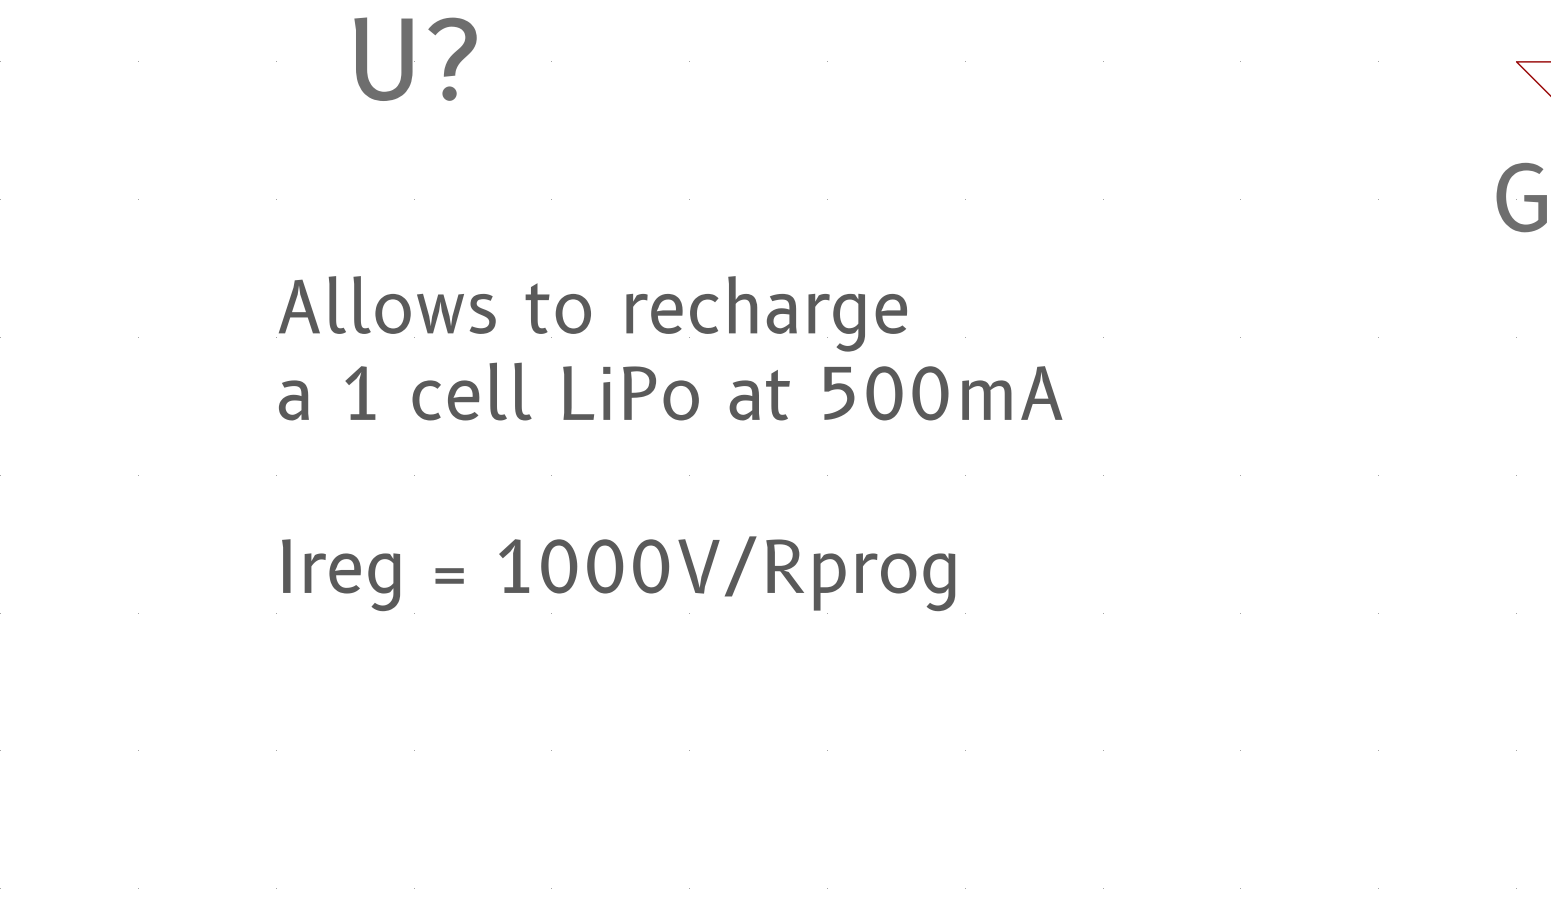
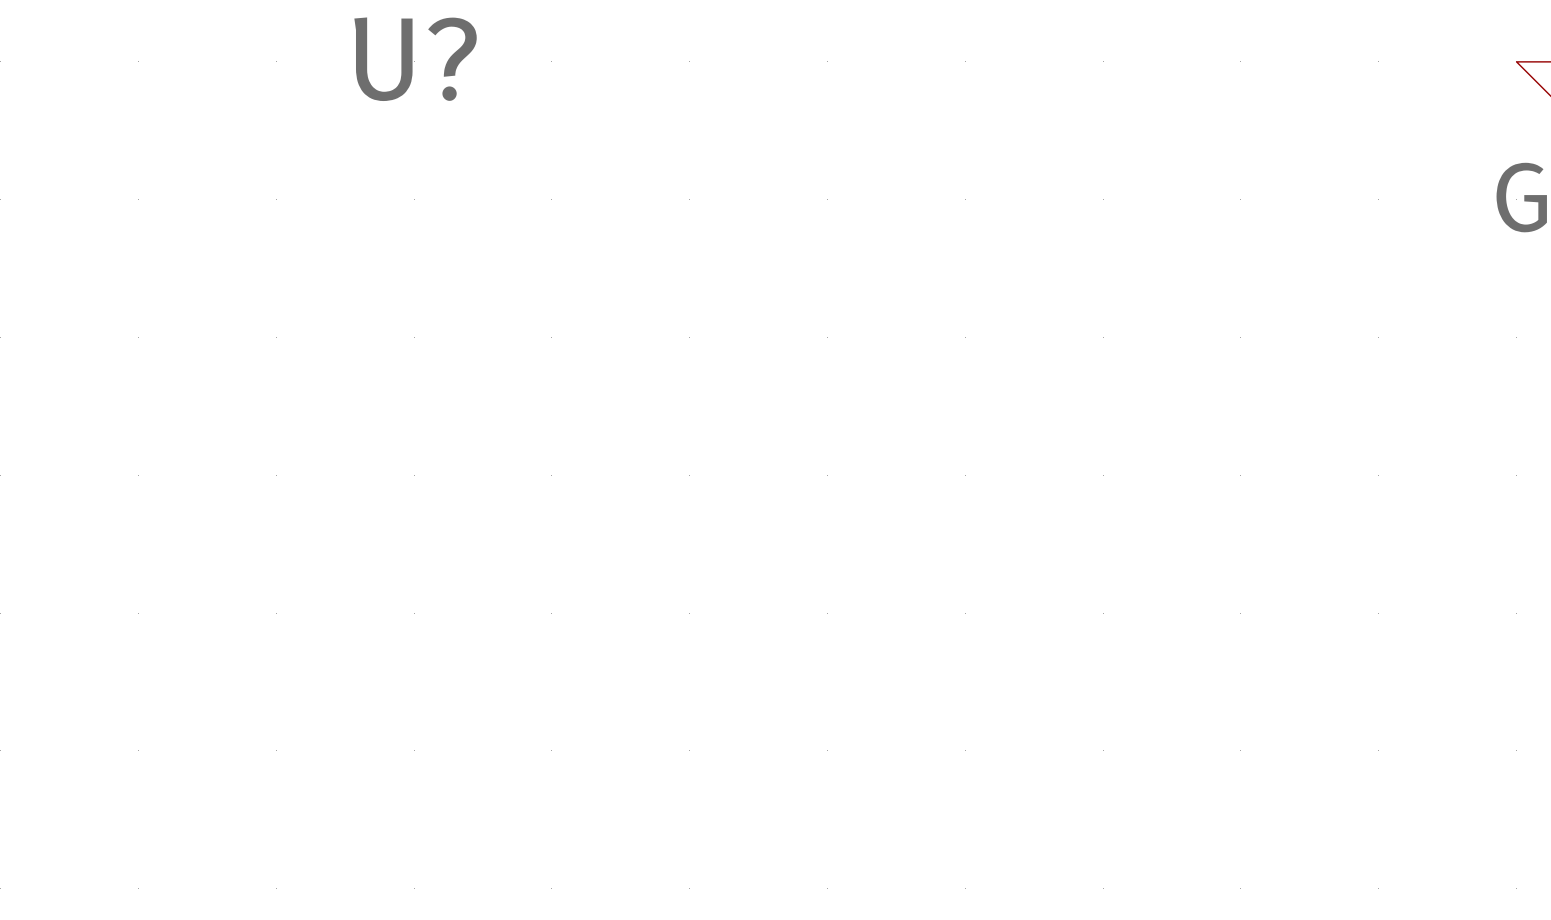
text: Allows to recharge (592, 313) -> none
text: a 1 cell LiPo at 500mA (670, 391) -> none
text: Ireg = 1000V/Rprog (618, 573) -> none

